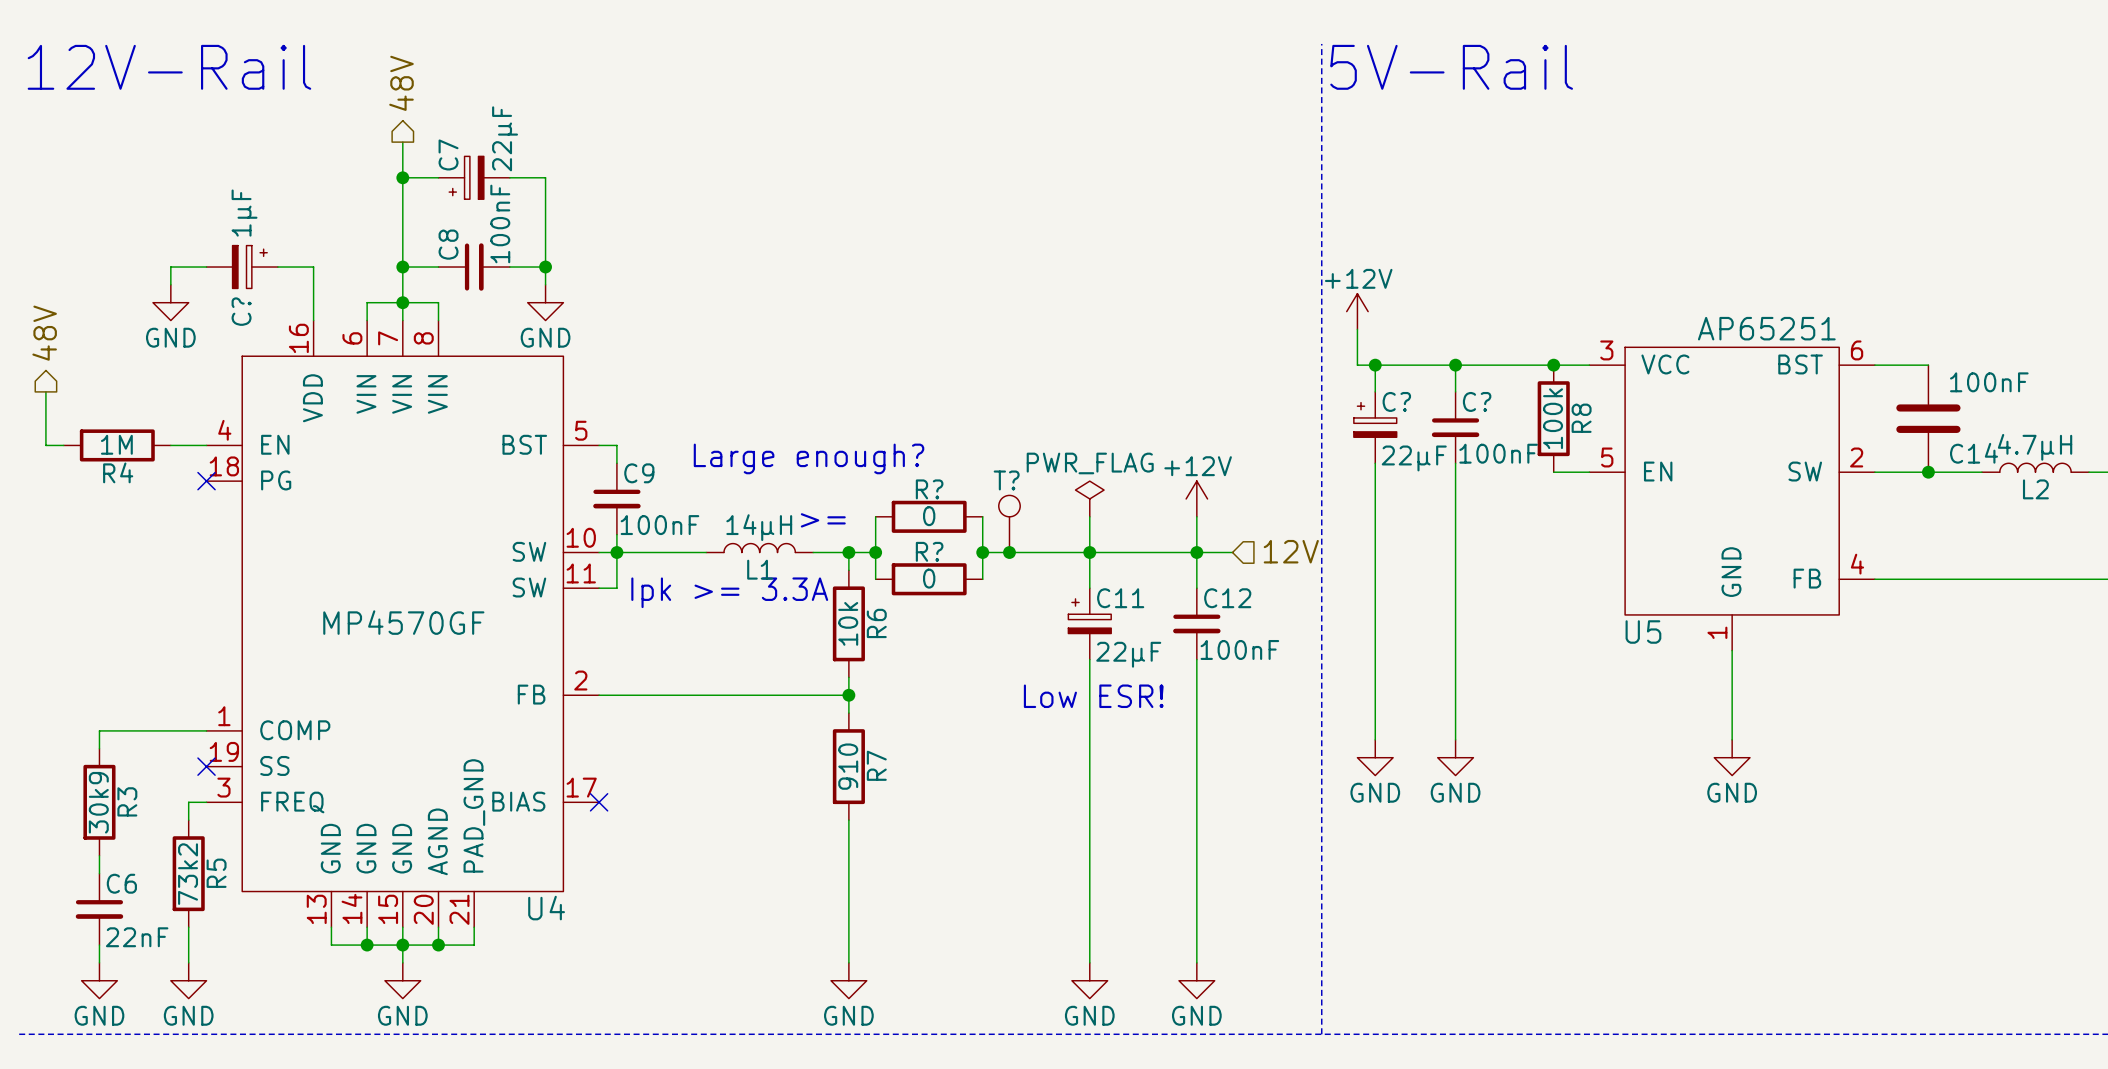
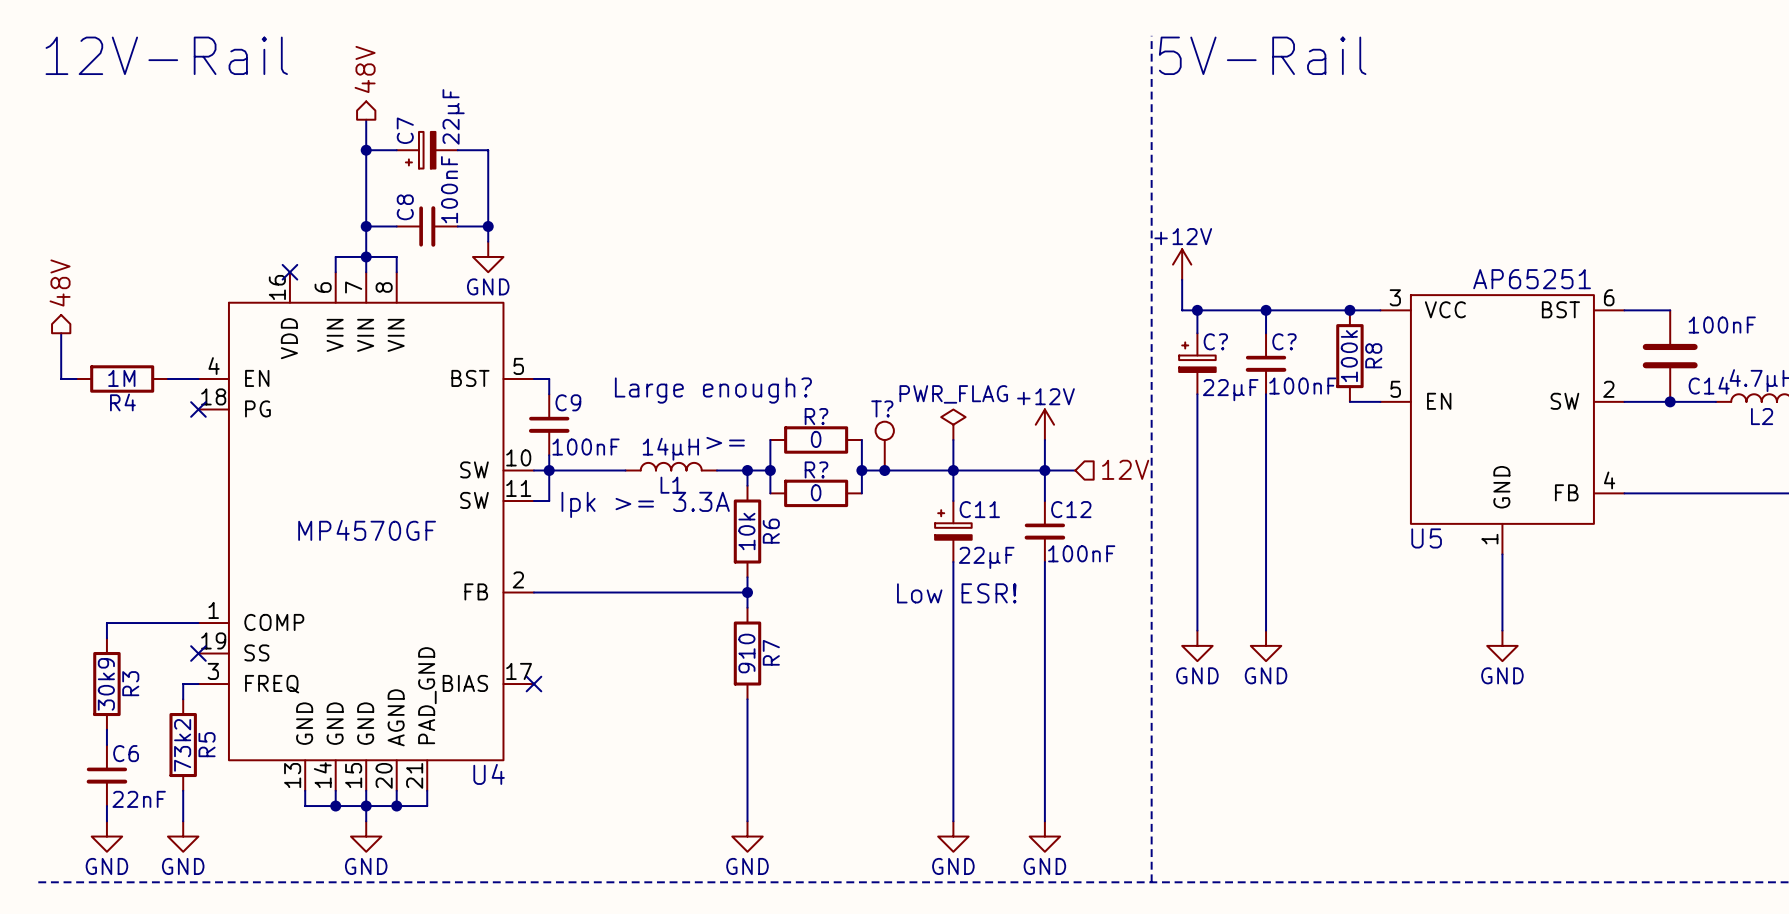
wire: (206, 267) (170, 267) (170, 284) -> none
C?: 1μF (242, 267) -> none
wire: (277, 267) (313, 267) (313, 320) -> none
power symbol: GND (170, 302) -> none
no-connect mark: none -> (289, 272)

